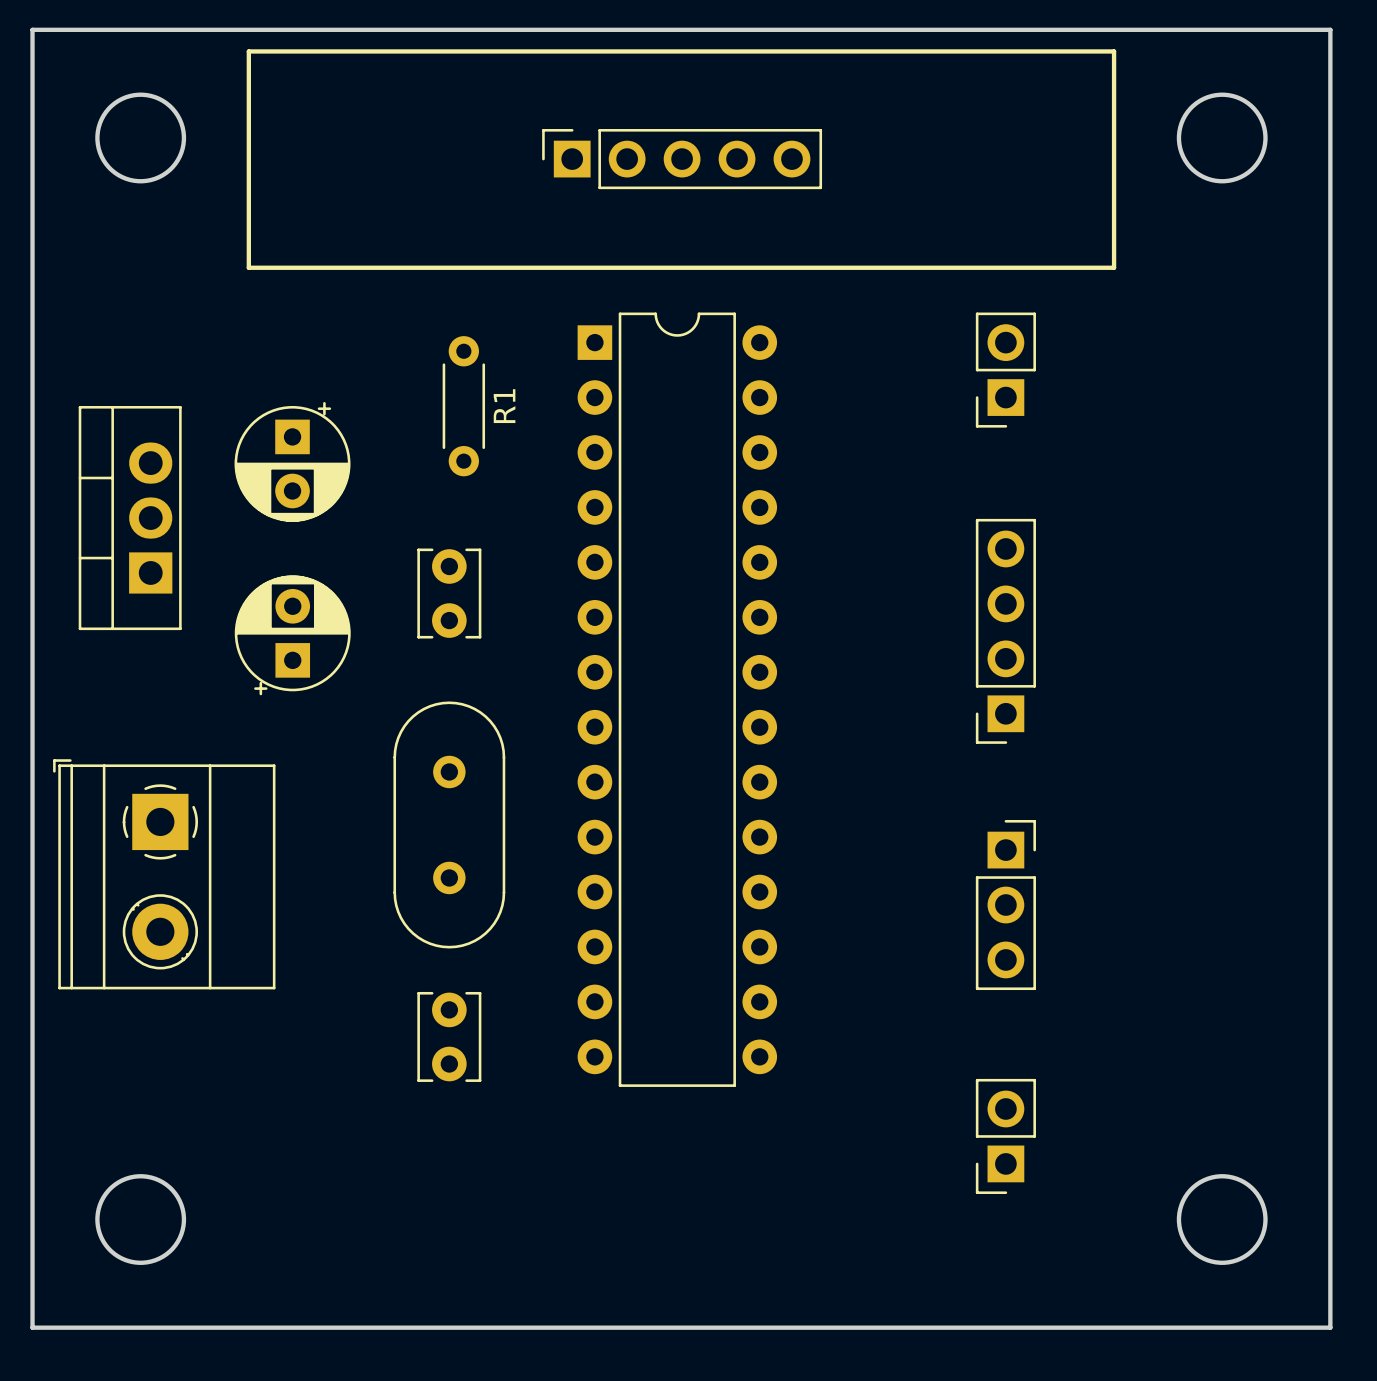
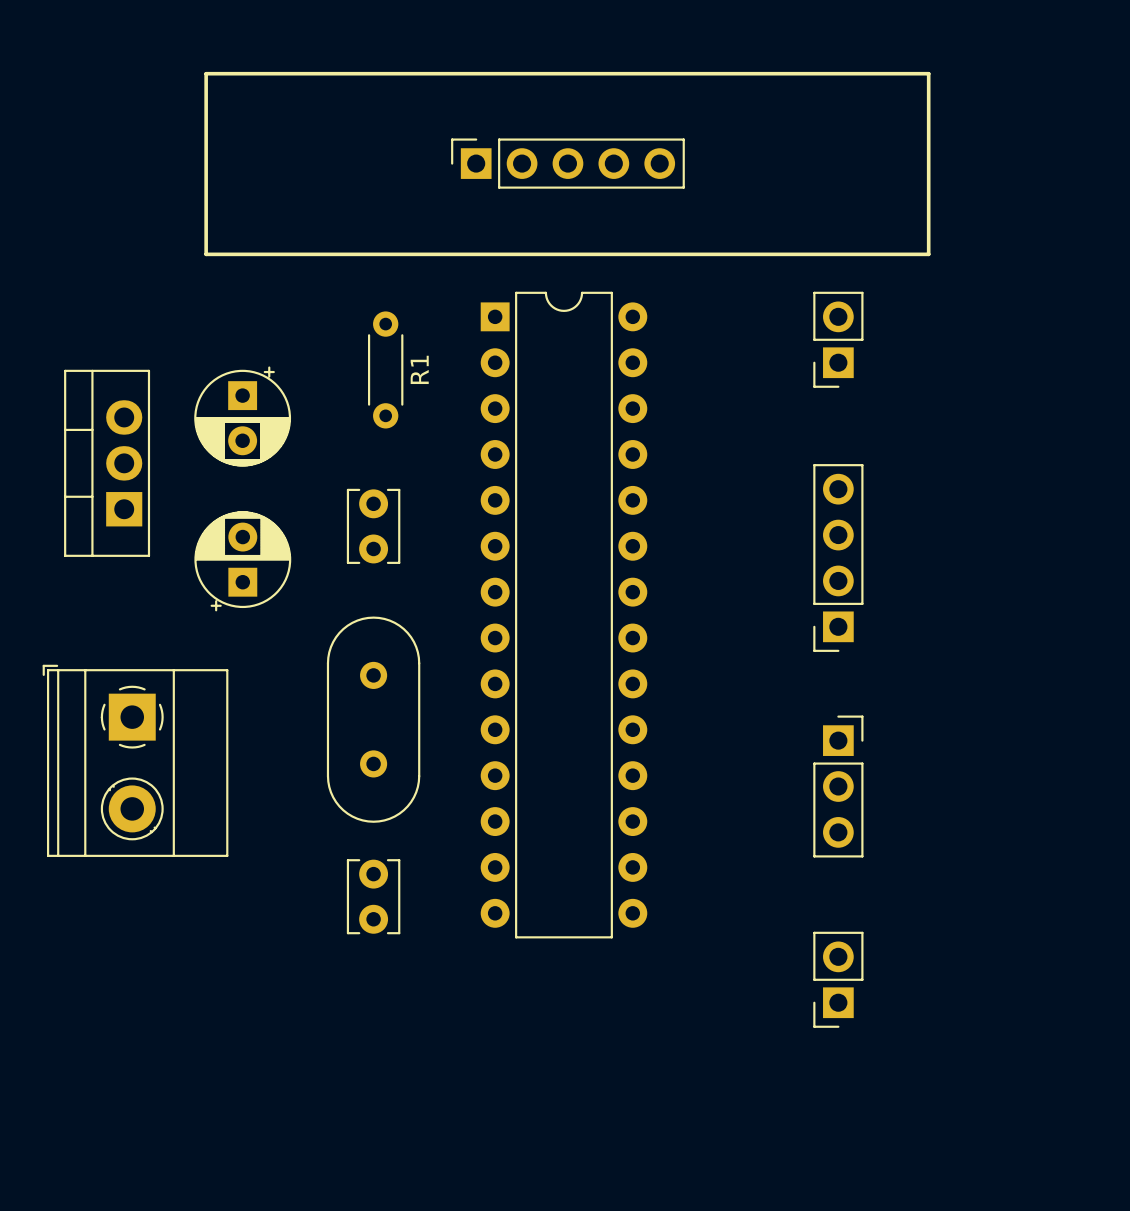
board edge: (32, 29) (1330, 29) (1330, 1327) (32, 1327) (32, 29) -> none
round board edge: [95, 92, 187, 184] -> none
round board edge: [1176, 92, 1268, 184] -> none
round board edge: [95, 1174, 187, 1265] -> none
round board edge: [1176, 1174, 1268, 1265] -> none

